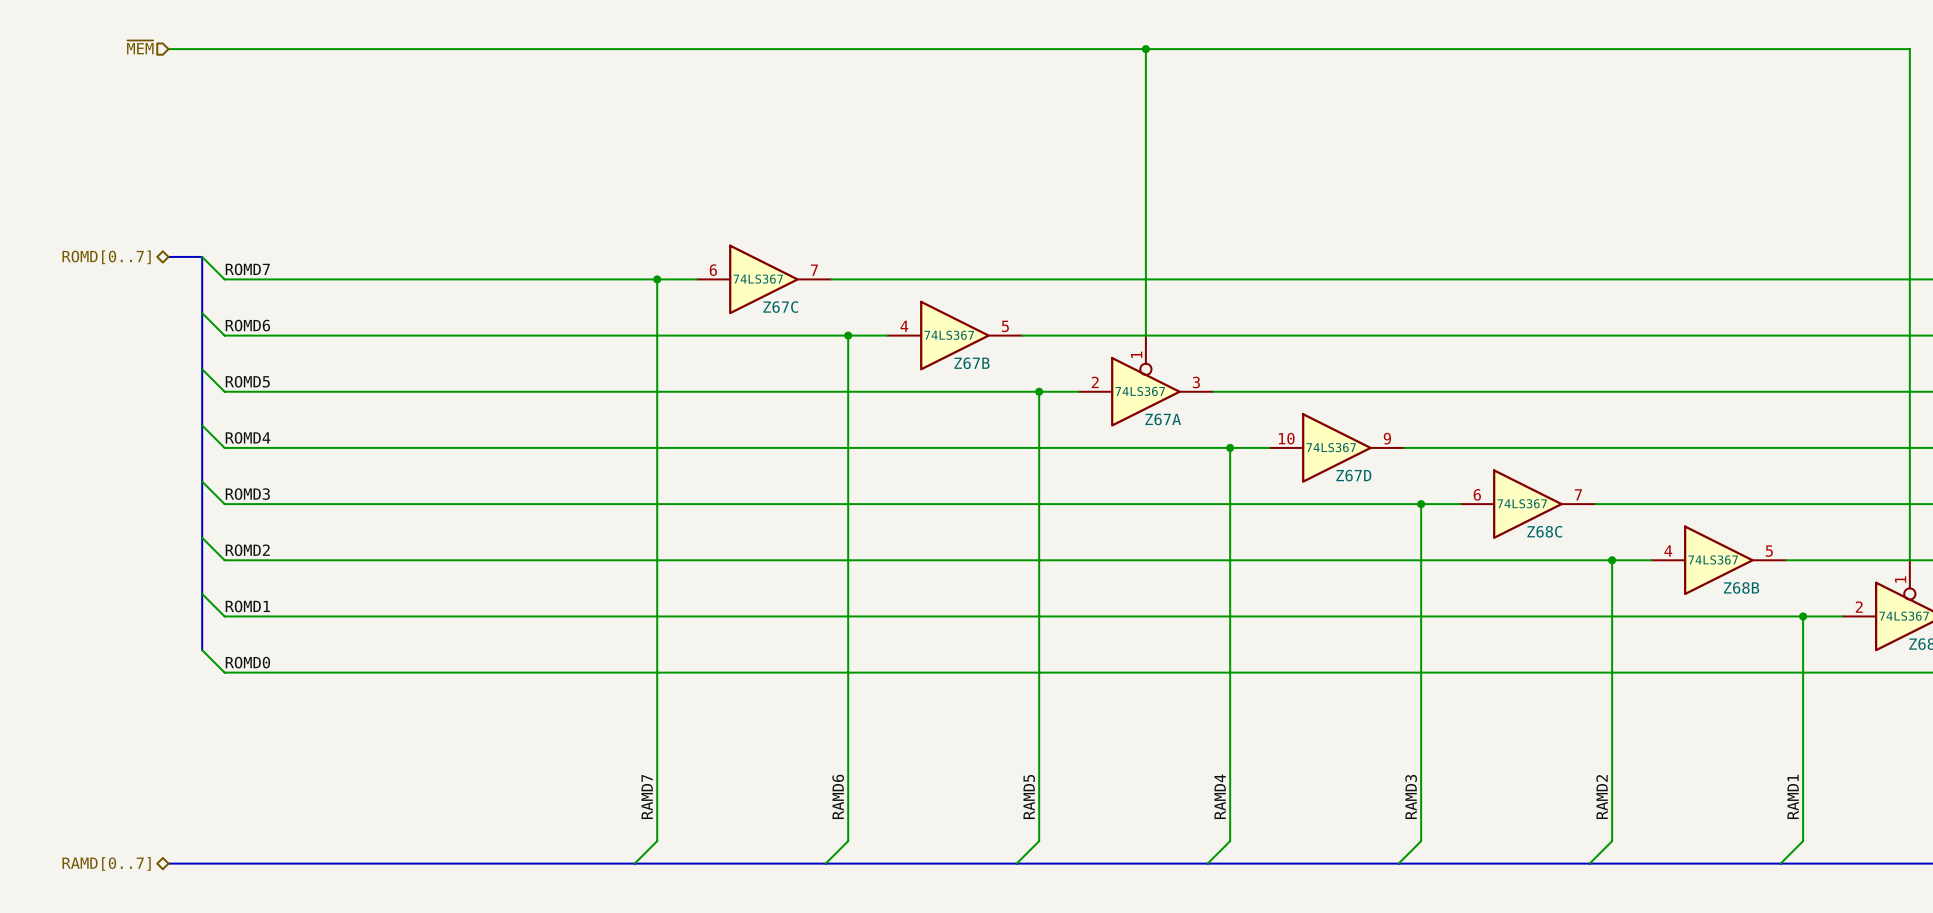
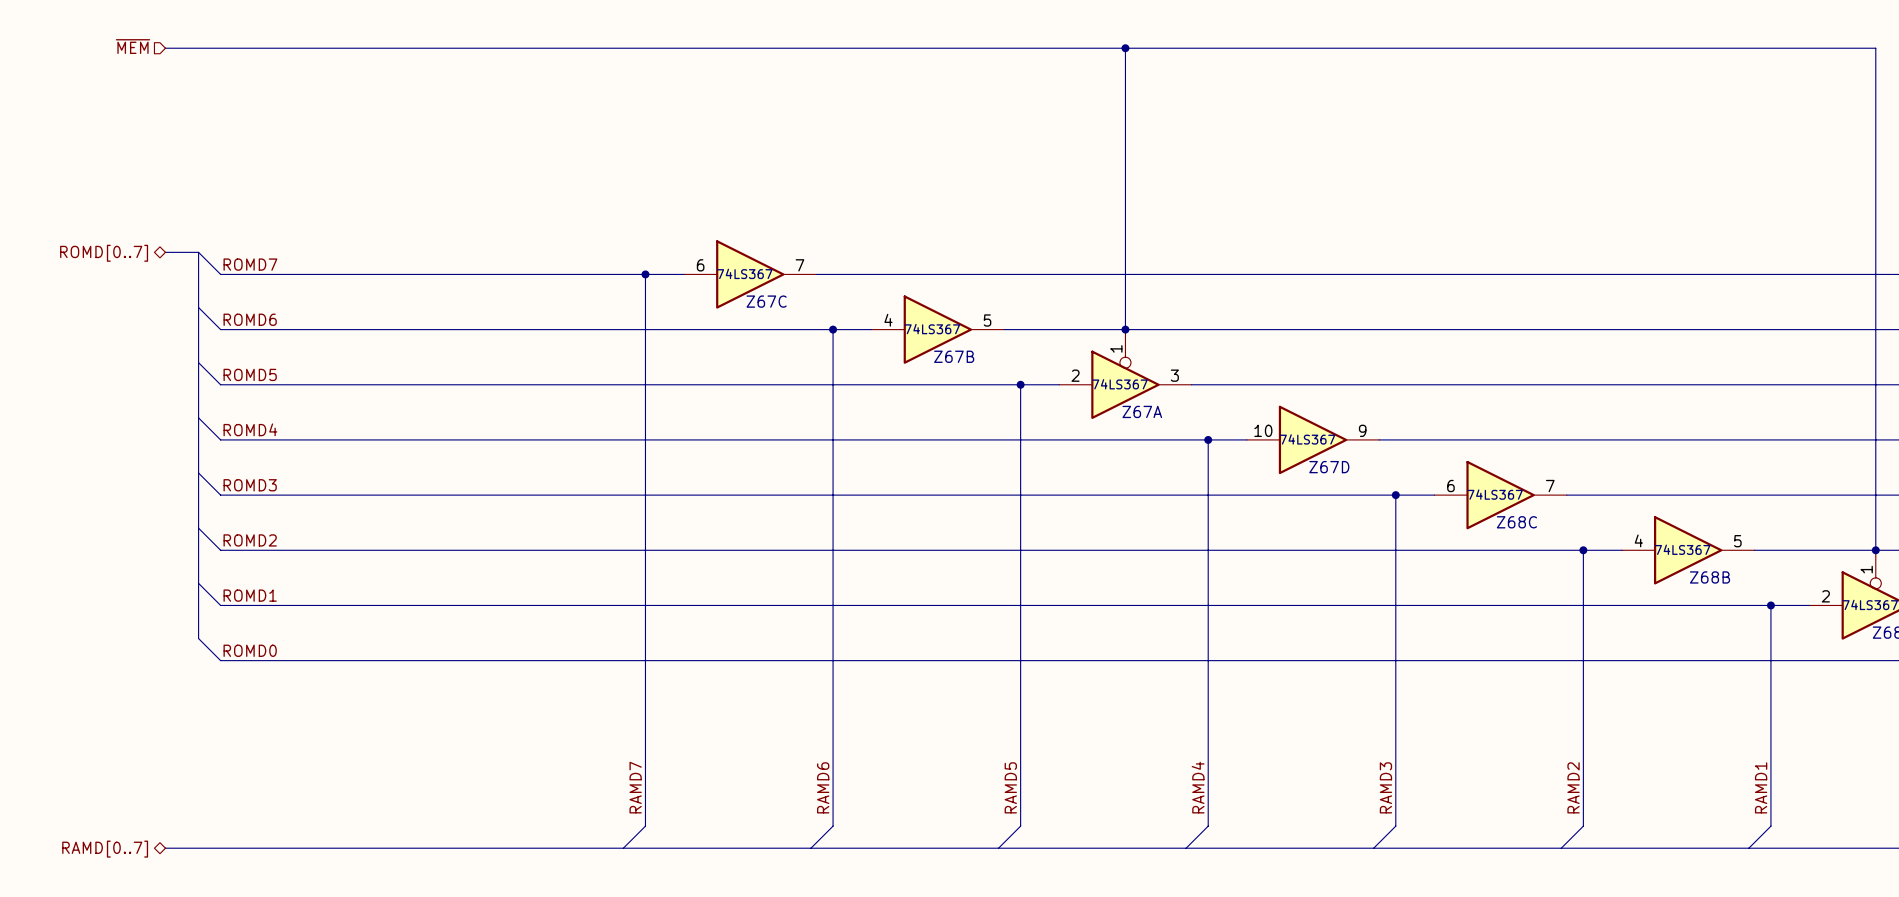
junction: none -> (1125, 329)
junction: none -> (1875, 550)

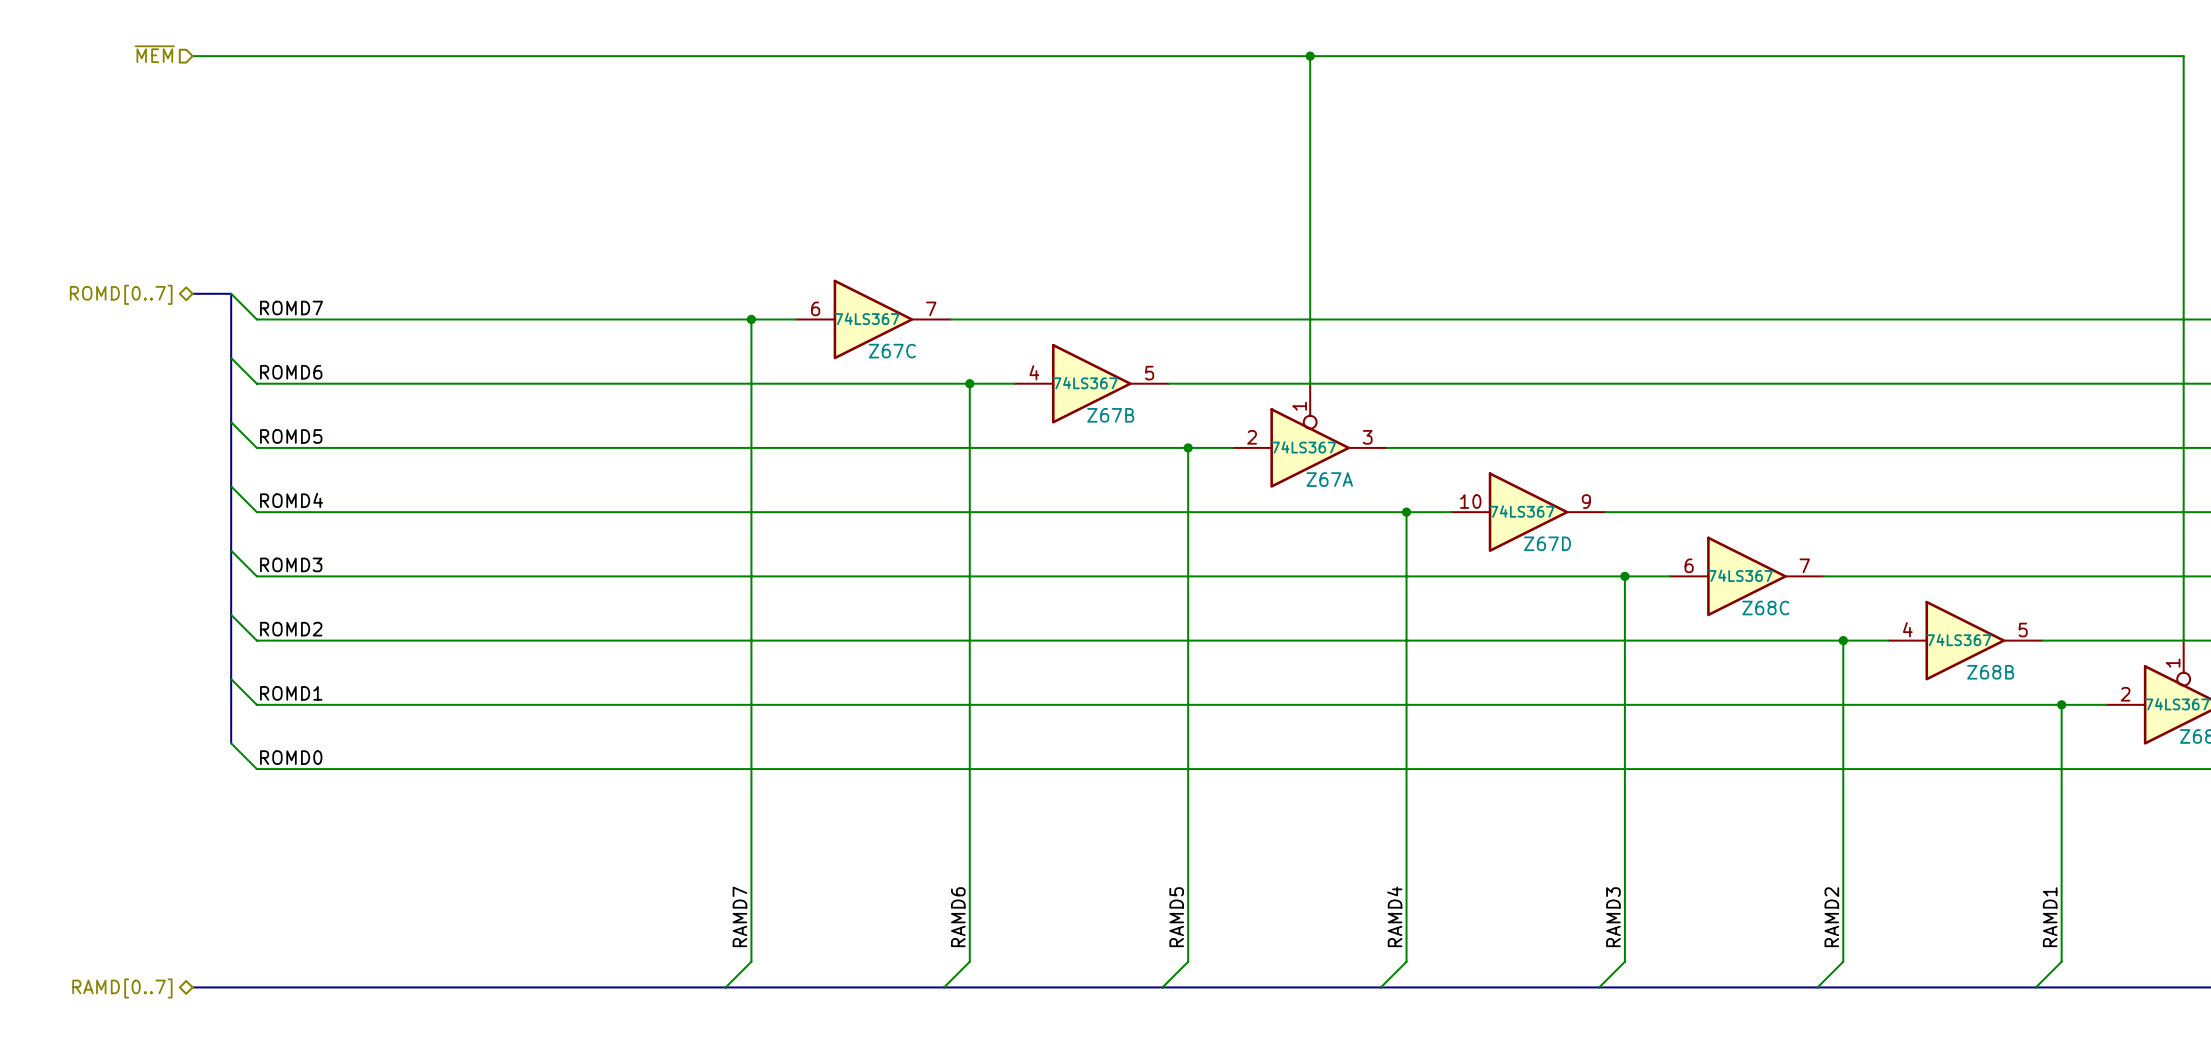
junction: (1125, 329) -> none
junction: (1875, 550) -> none

